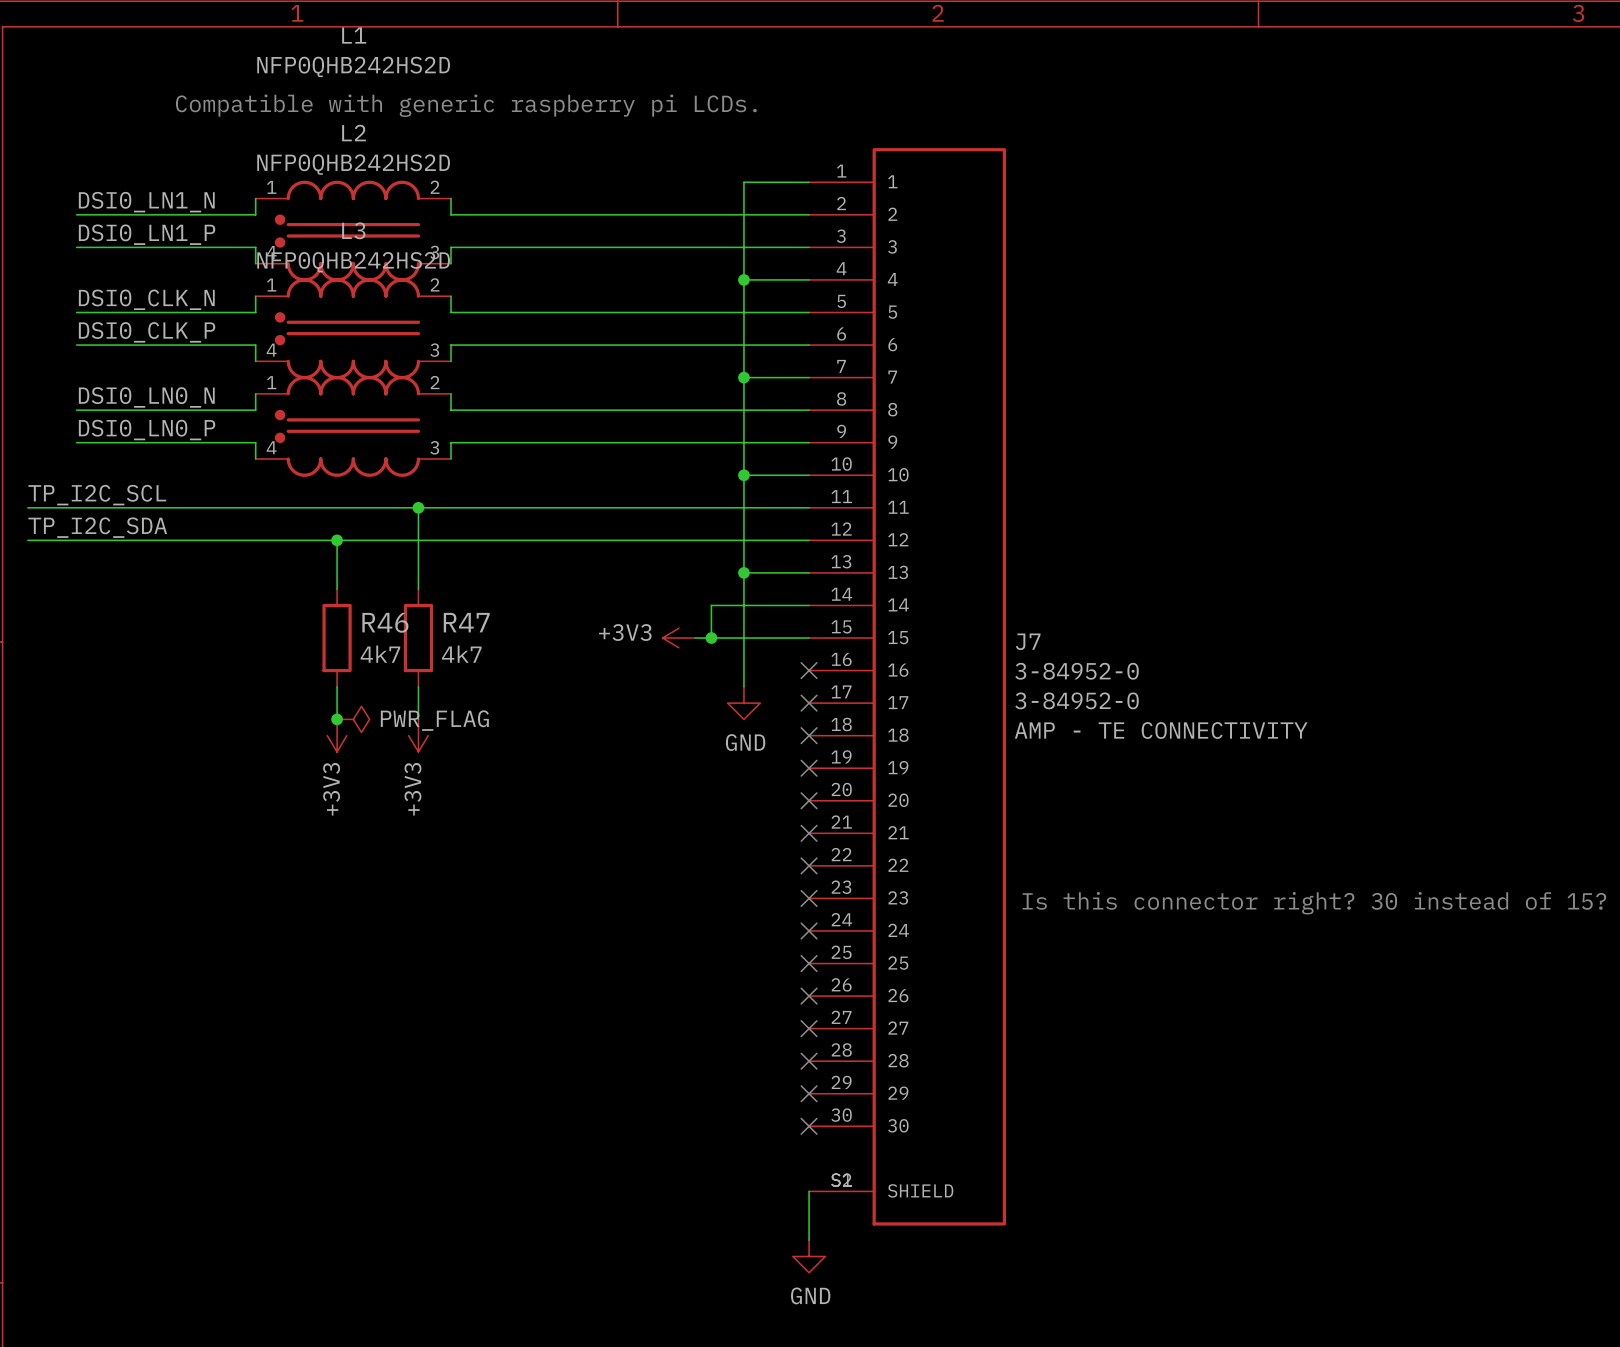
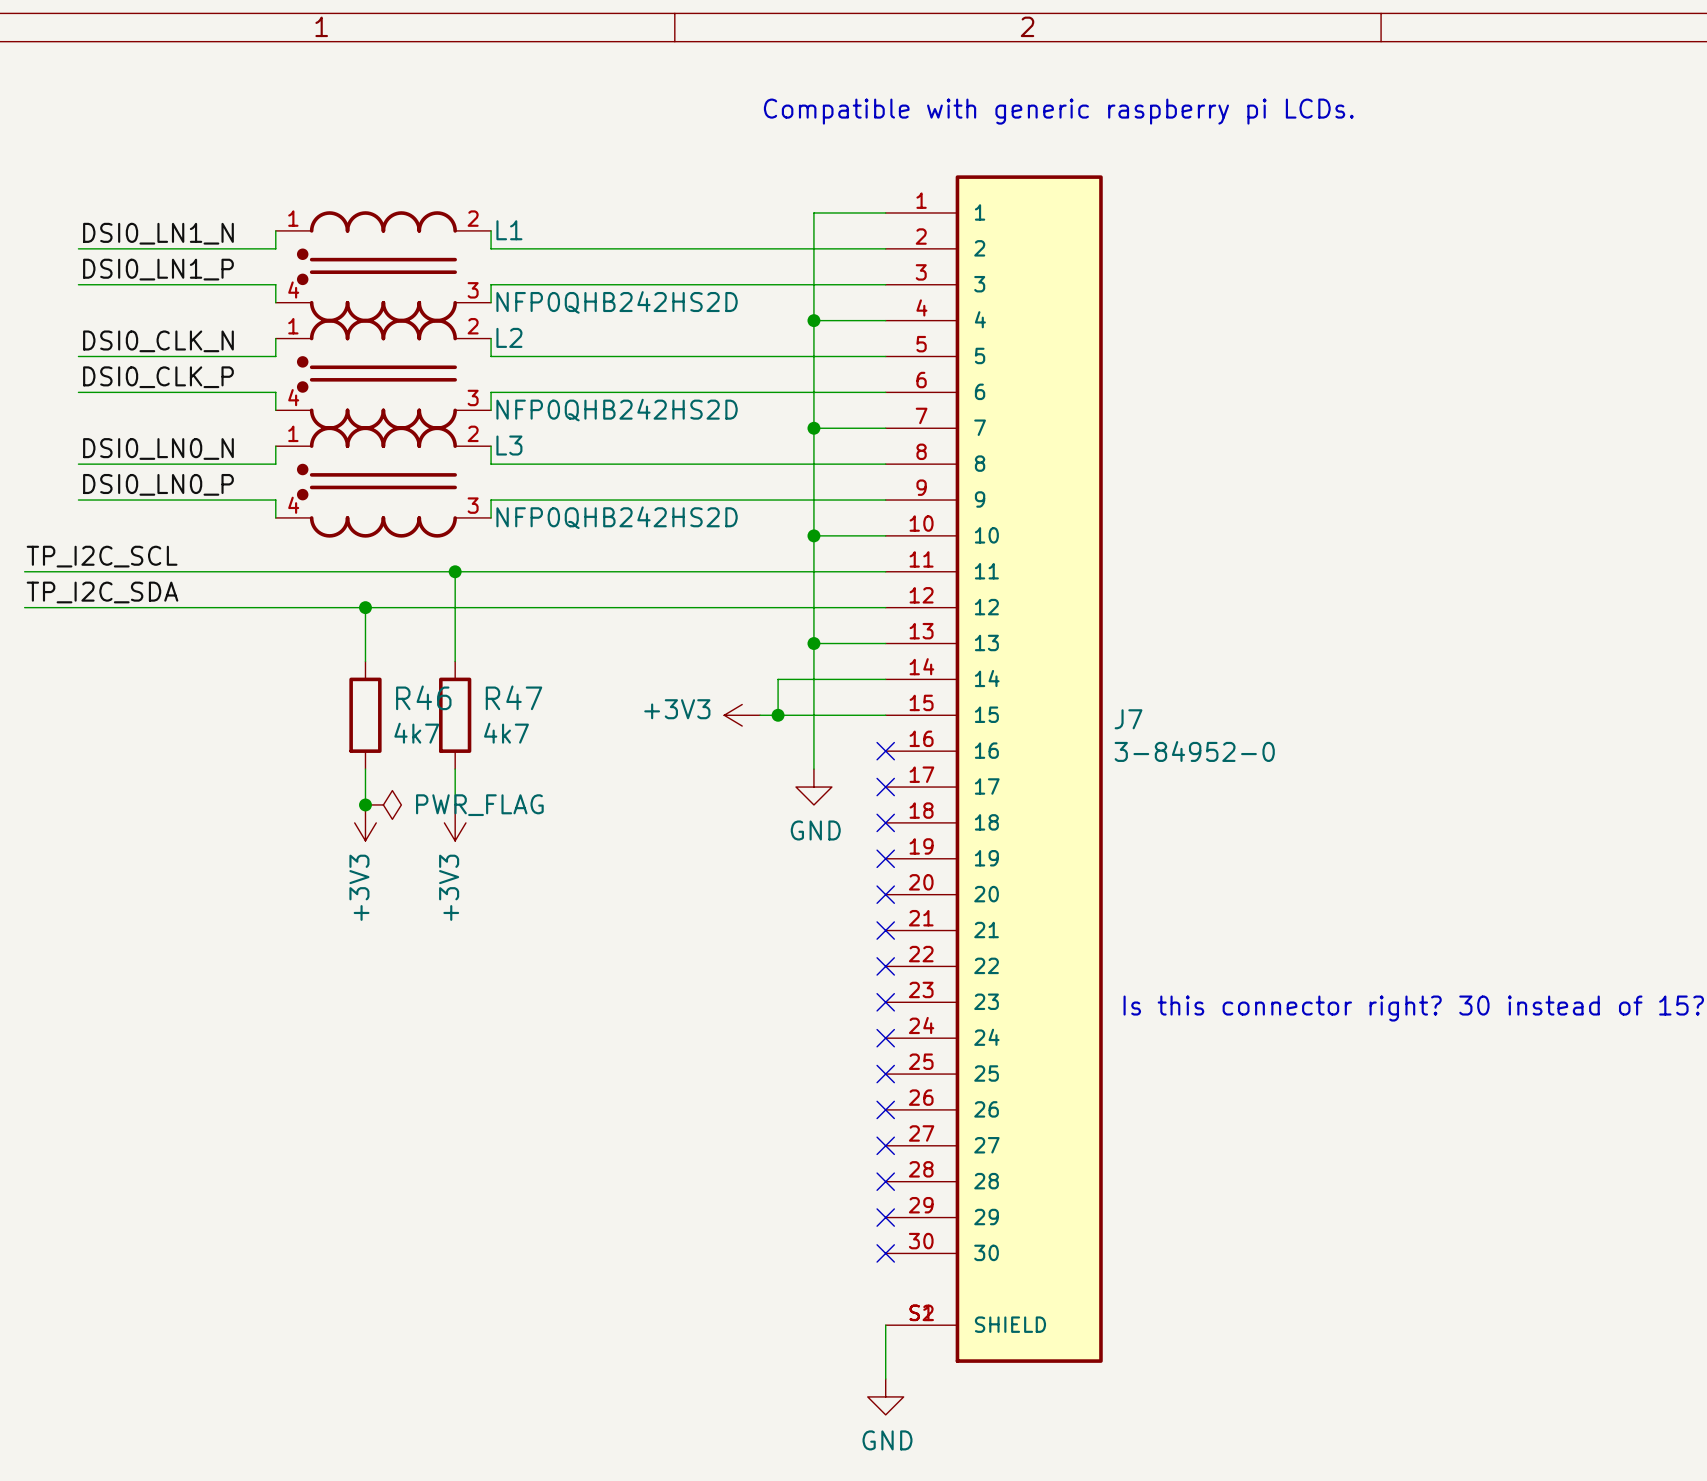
L1 name position: L1 (354, 35) -> L1 (509, 230)
L1 value position: NFP0QHB242HS2D (353, 66) -> NFP0QHB242HS2D (617, 302)
text: none -> Compatible with generic raspberry pi LCDs. (1058, 111)
text: Compatible with generic raspberry pi LCDs. (466, 105) -> none
L2 name position: L2 (354, 133) -> L2 (509, 337)
L2 value position: NFP0QHB242HS2D (353, 164) -> NFP0QHB242HS2D (617, 410)
L3 name position: L3 (353, 230) -> L3 (509, 445)
L3 value position: NFP0QHB242HS2D (353, 262) -> NFP0QHB242HS2D (617, 517)
J7 text: 3-84952-0 (1077, 700) -> none
J7 text: AMP - TE CONNECTIVITY (1161, 730) -> none

